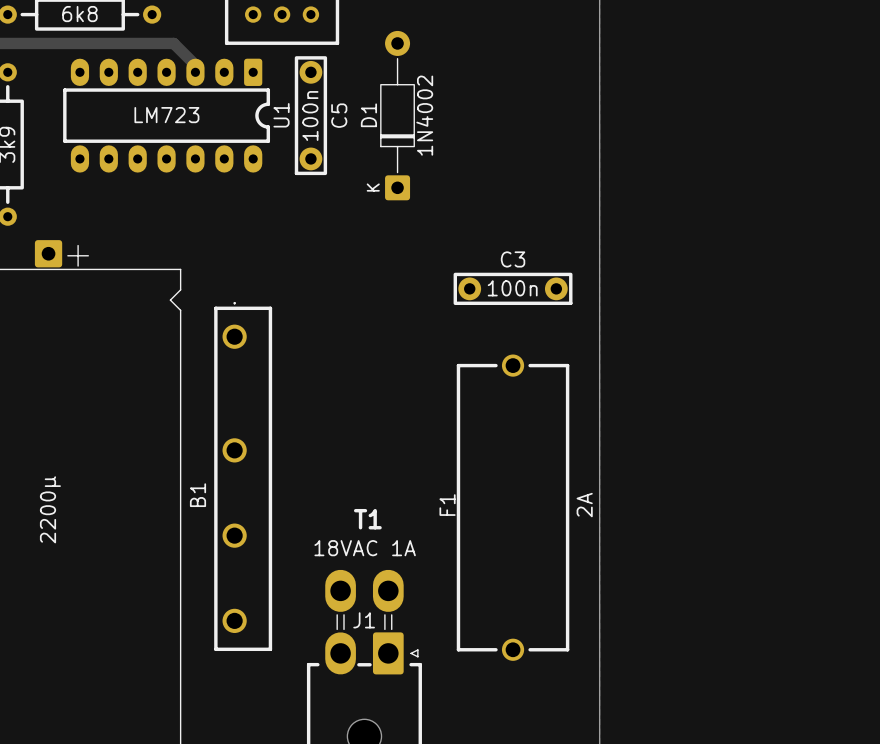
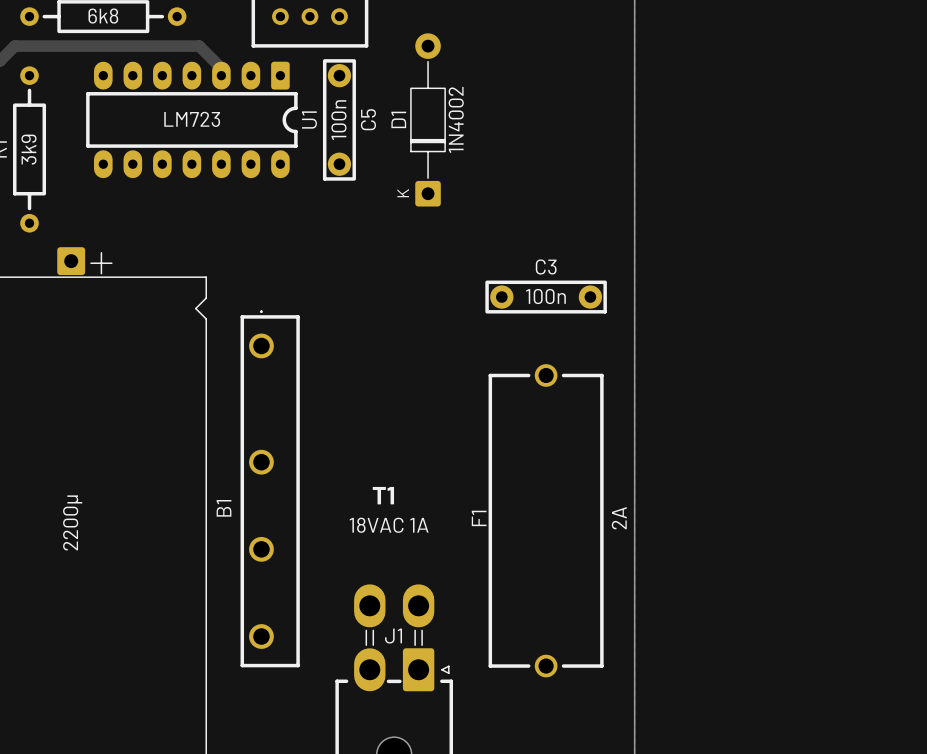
text position: T1 (367, 519) -> T1 (383, 495)
J1 value position: 18VAC 1A (365, 548) -> 18VAC 1A (389, 525)

